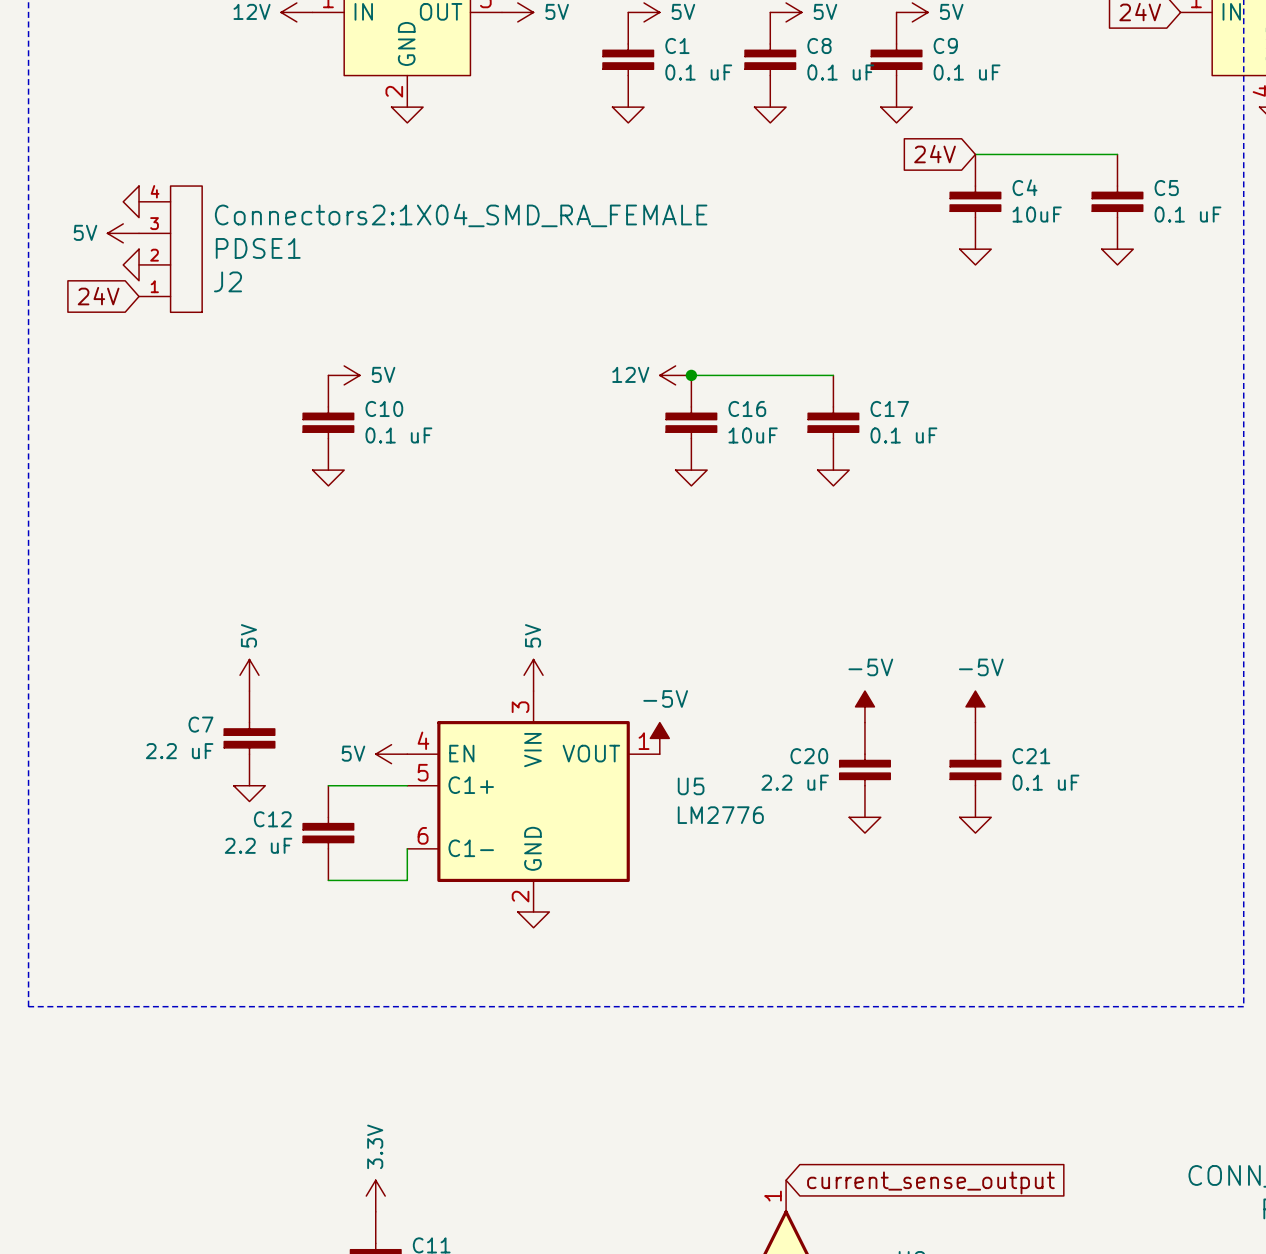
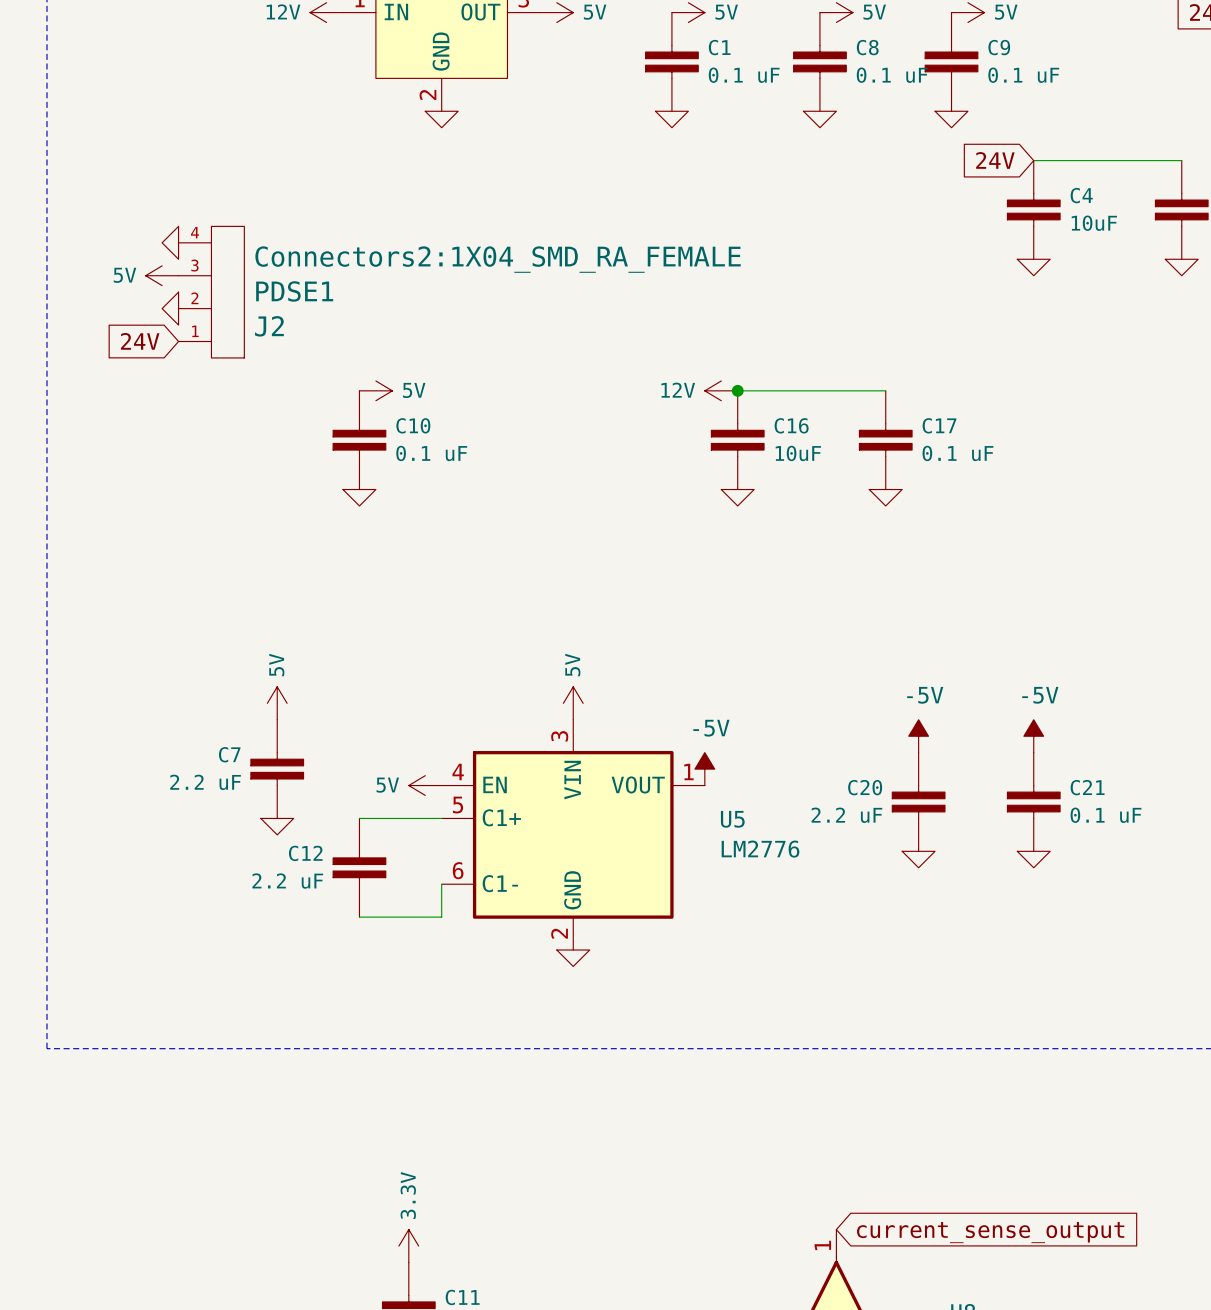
power symbol position: (131, 201) -> (170, 242)
power symbol: 5V (123, 233) -> none
power symbol shape: [123, 249, 140, 281] -> [145, 265, 179, 286]
J2 position: (170, 249) -> (211, 292)
power symbol text: none -> 5V (124, 275)
global label position: 24V (98, 296) -> 24V (140, 341)
power symbol: none -> (170, 308)

